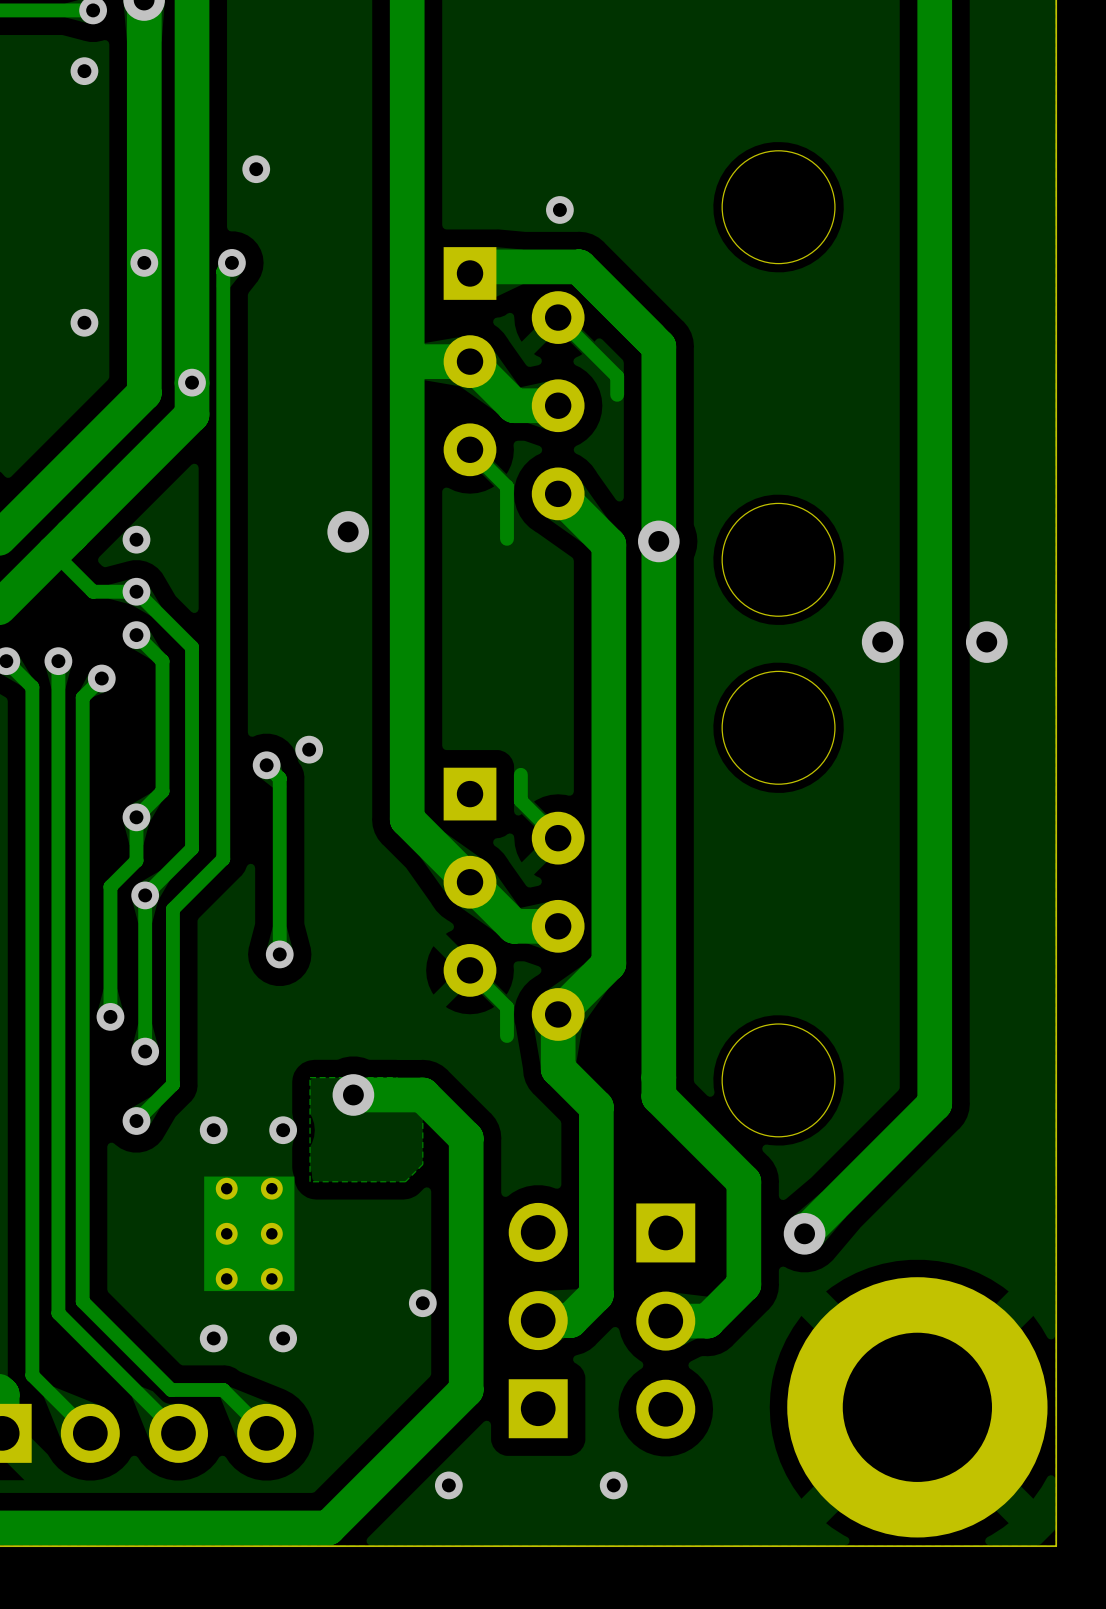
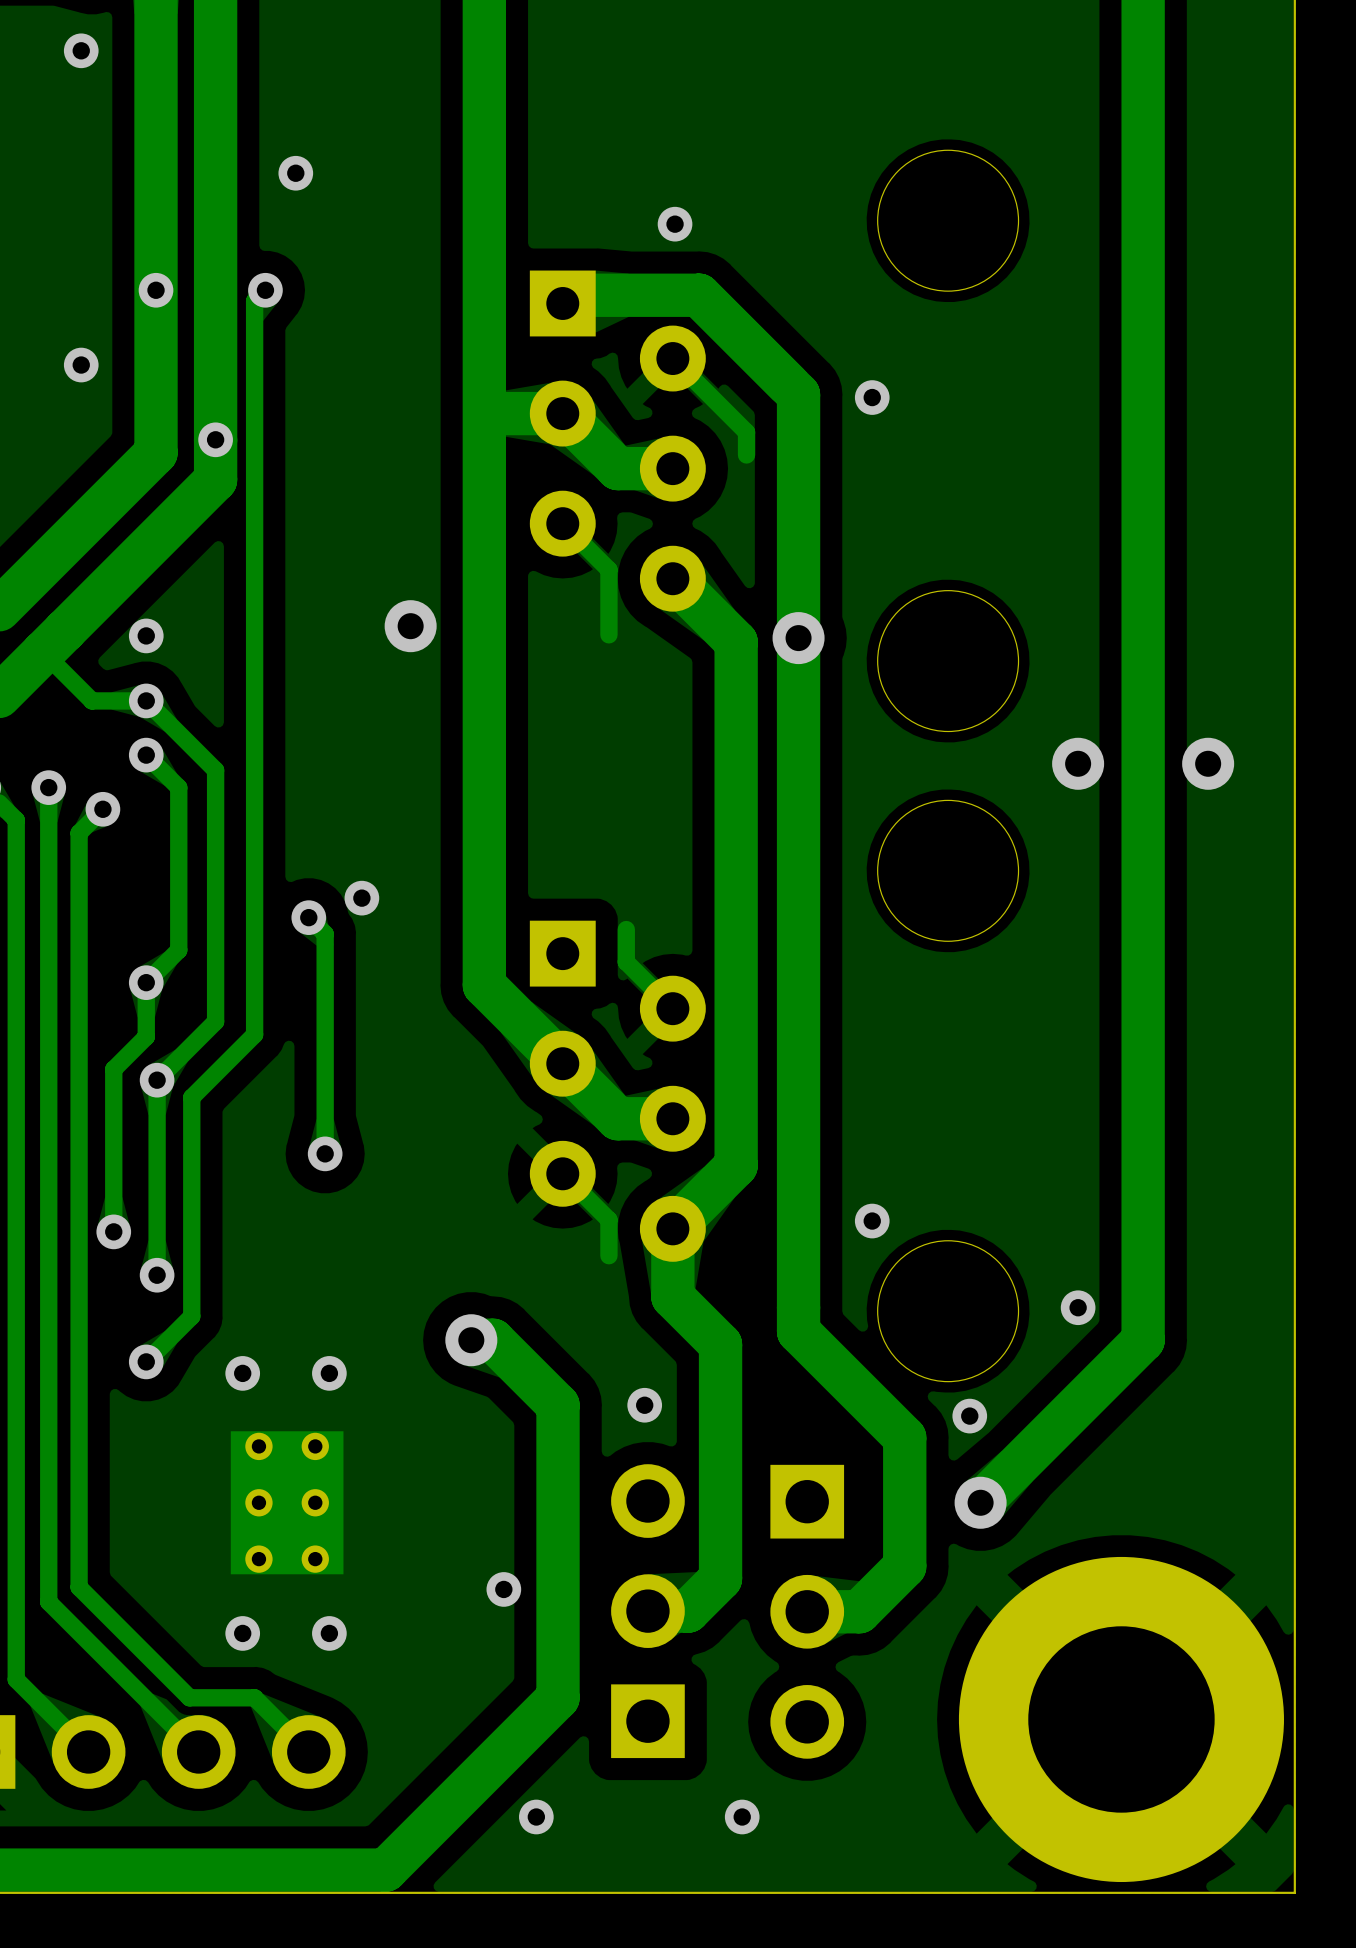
via: none -> (872, 397)
via: none -> (872, 1221)
zone outline: (396, 1077) (310, 1077) (310, 1181) (405, 1181) (422, 1164) (422, 1103) (396, 1077) -> none
via: none -> (1078, 1307)
track: (353, 1094) (422, 1094) (466, 1138) (466, 1155) -> (471, 1340) (493, 1340) (558, 1405)
via position: (353, 1094) -> (471, 1340)
via: none -> (644, 1405)
via: none -> (969, 1416)

